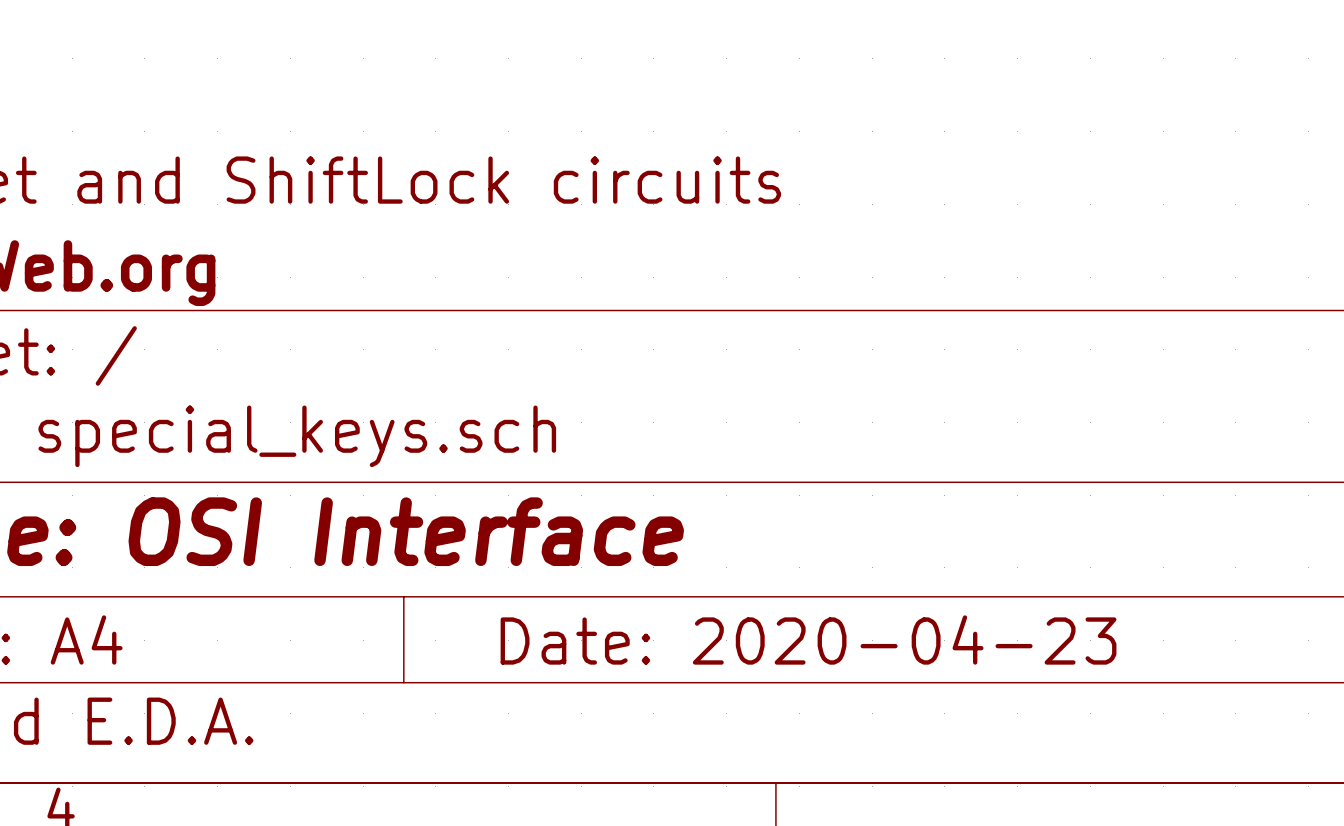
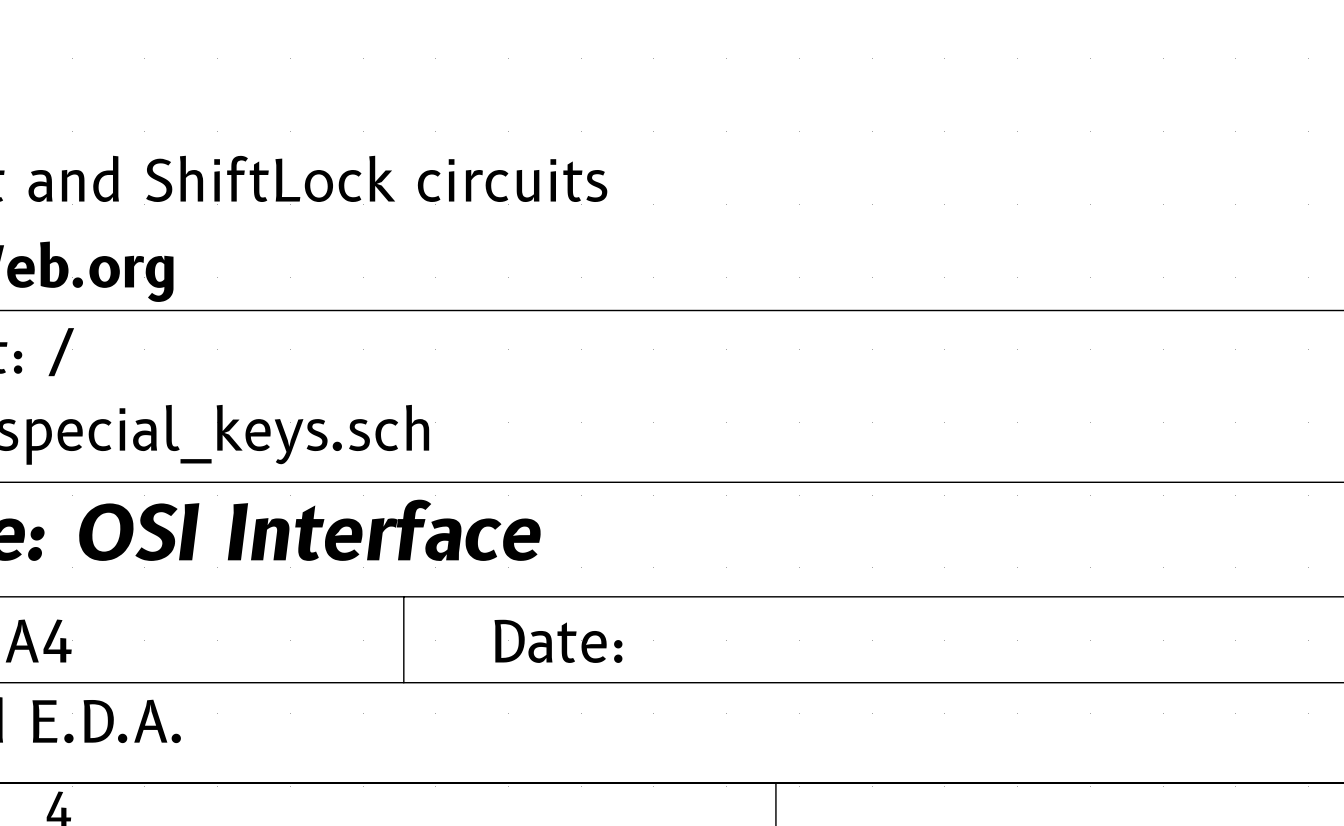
title block: Date: 2020-04-23 (808, 639) -> Date: (558, 641)

